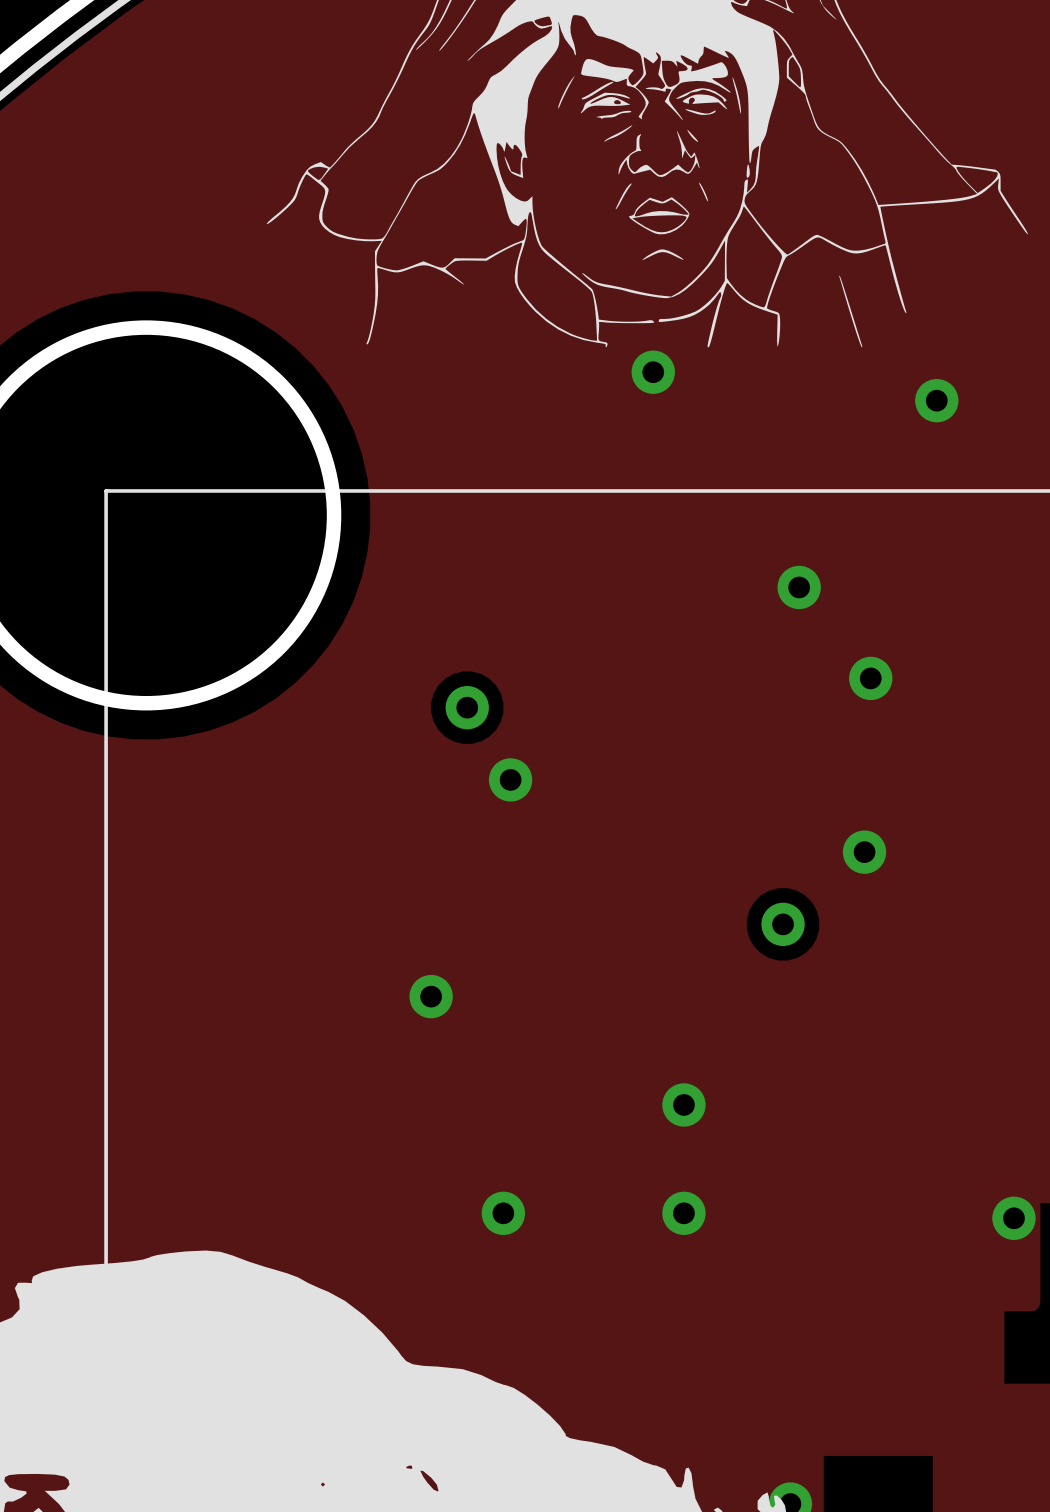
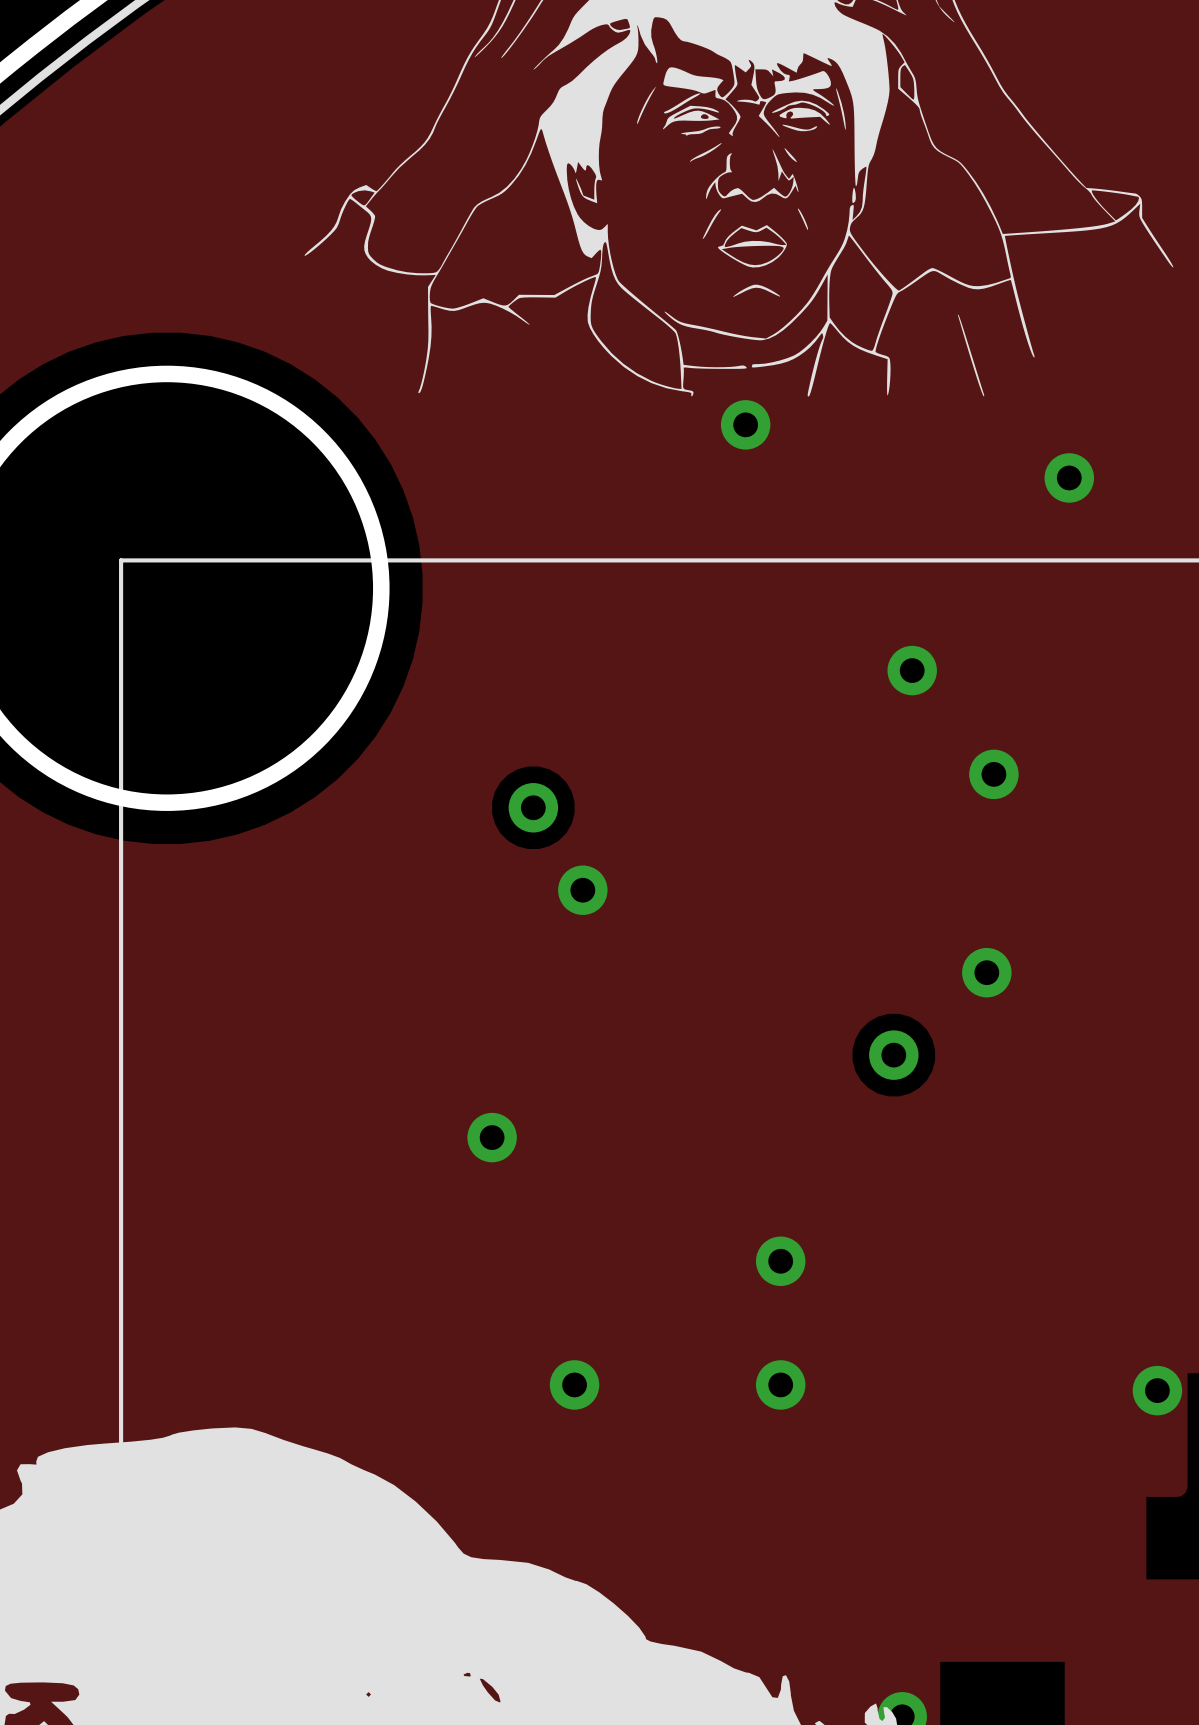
via position: (936, 400) -> (1069, 477)

